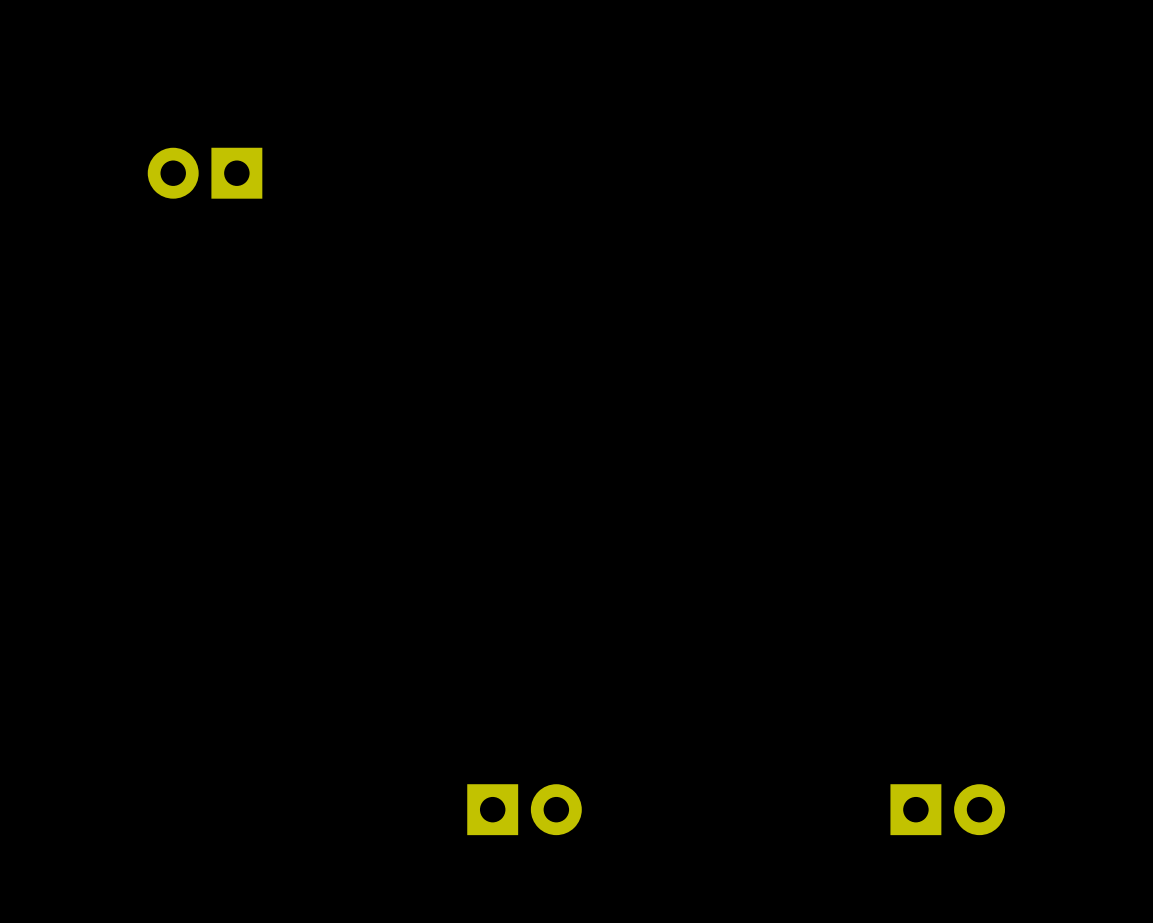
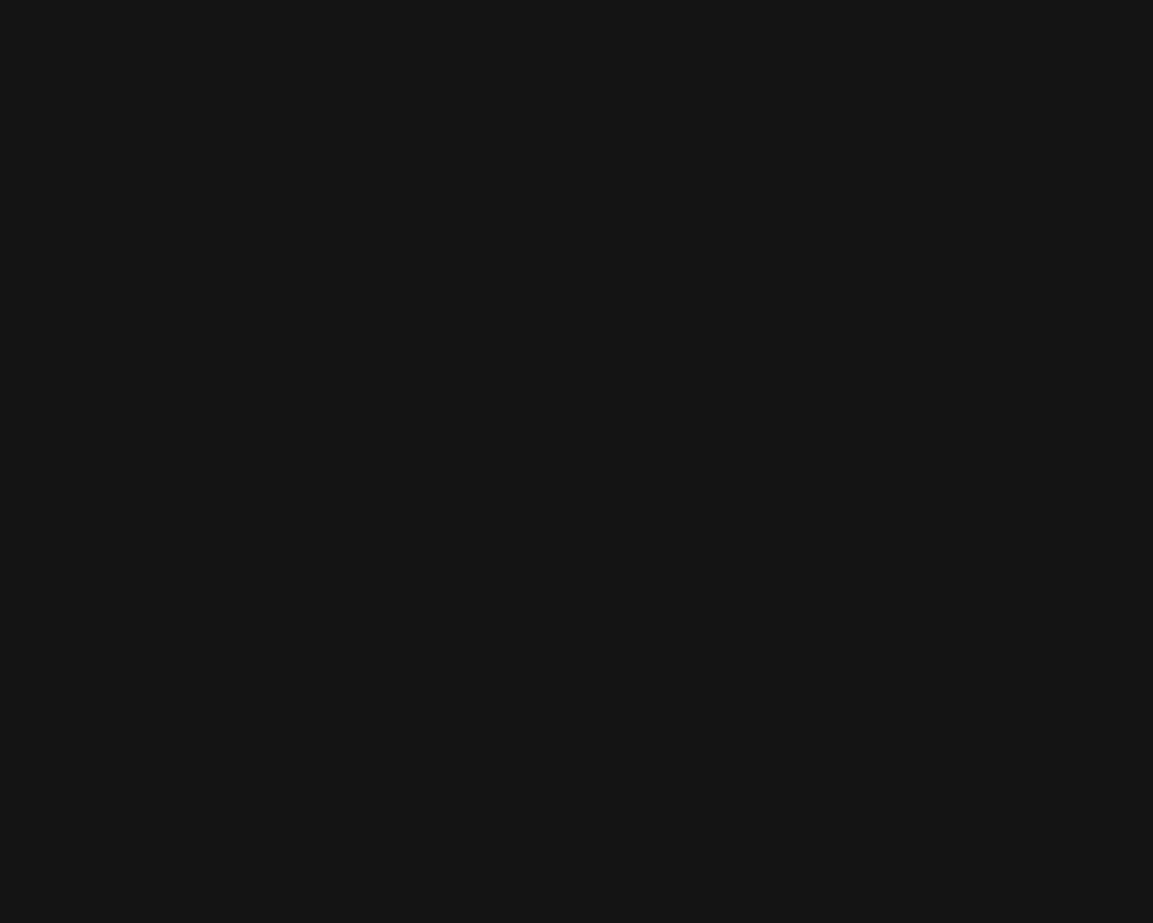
part: (205, 173) -> none
part: (524, 809) -> none
part: (947, 809) -> none

